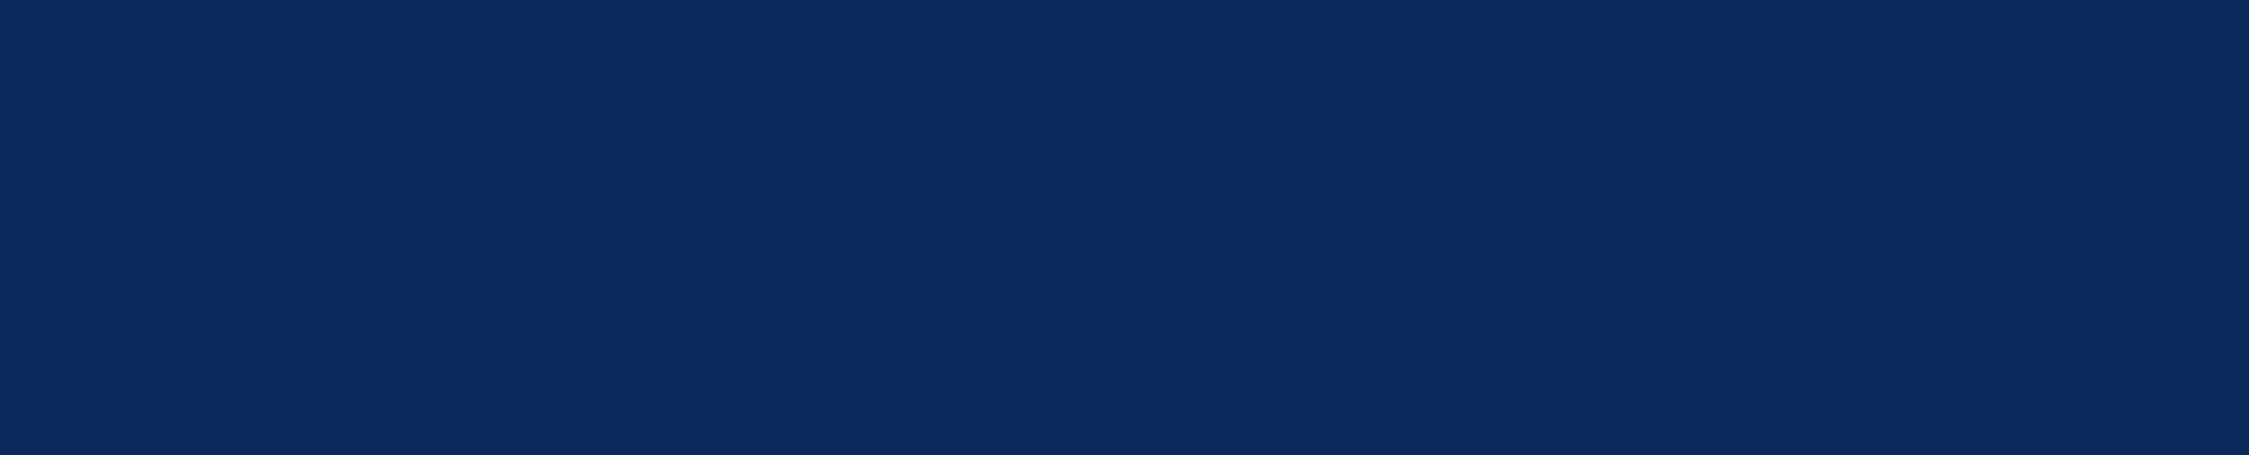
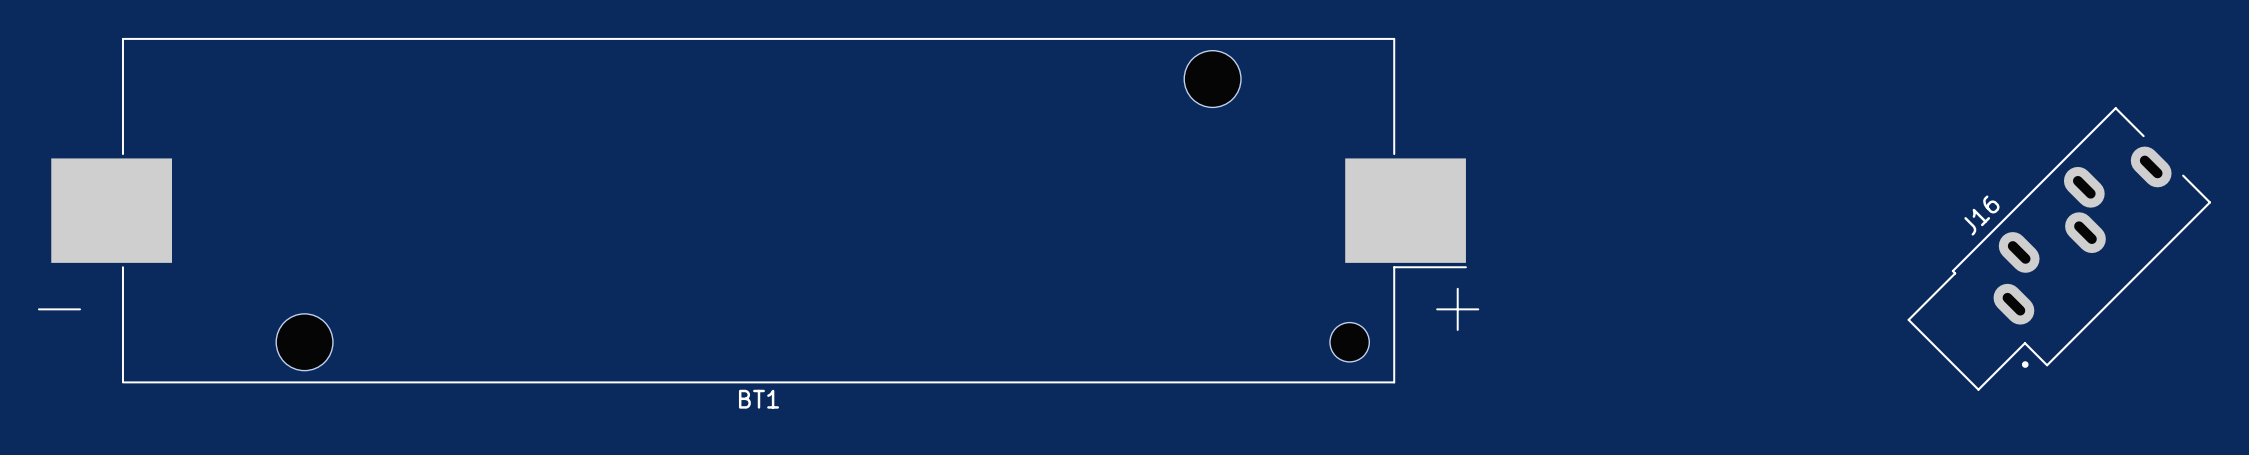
BT1: none -> (758, 210)
J16: none -> (2059, 248)

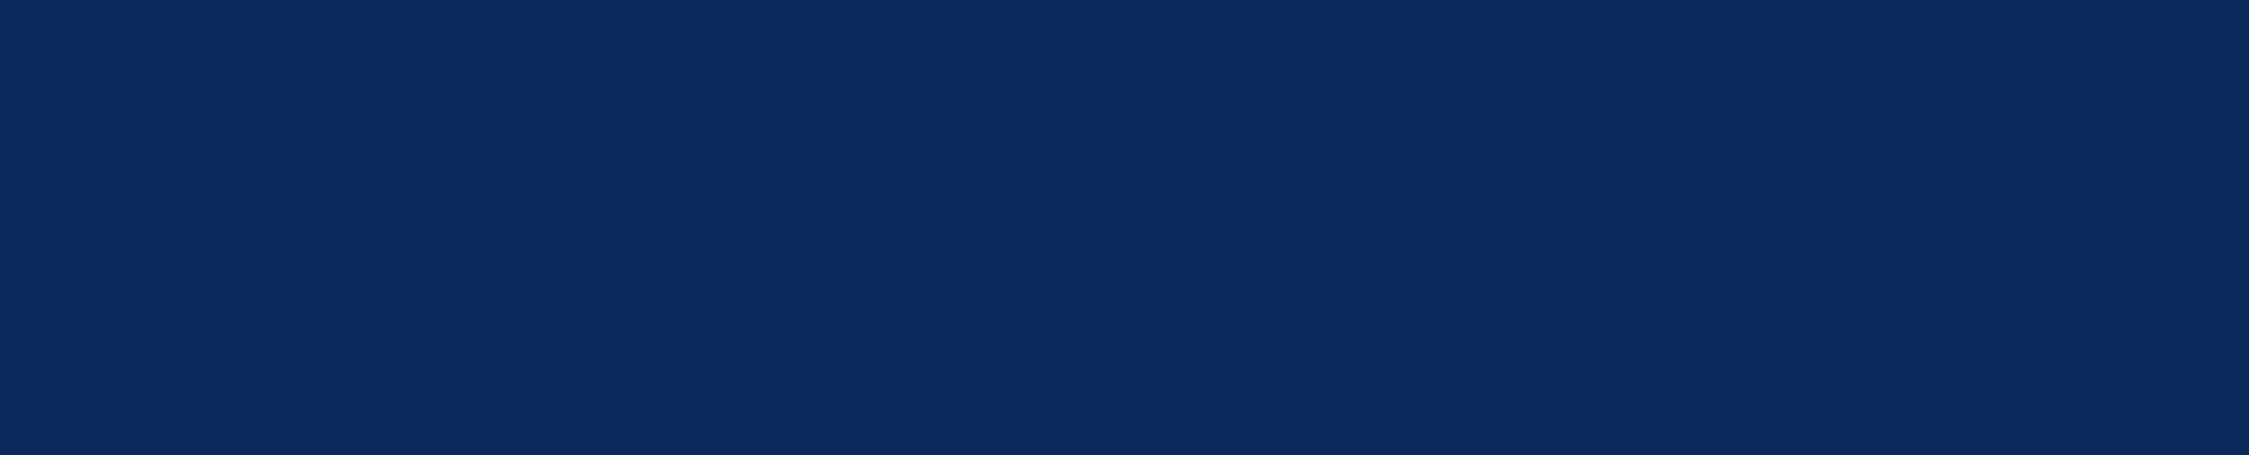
BT1: (758, 210) -> none
J16: (2059, 248) -> none

